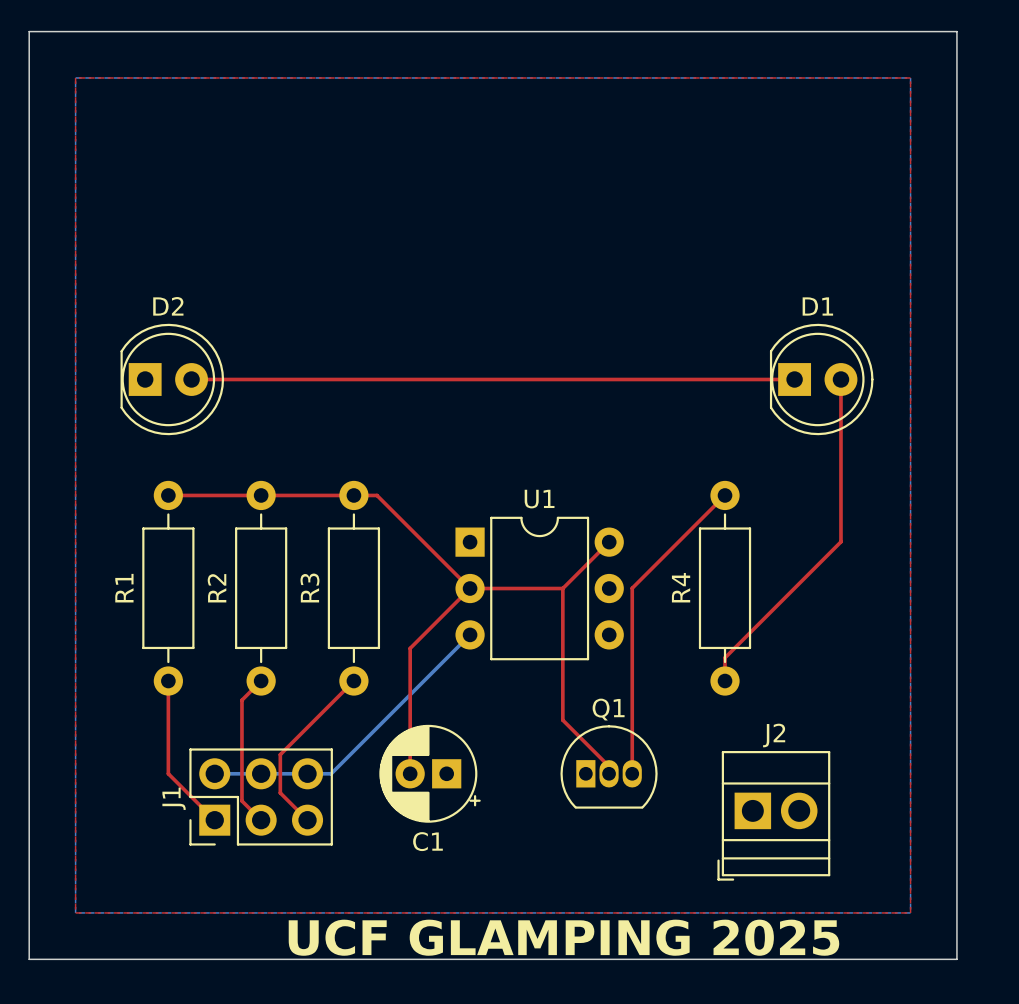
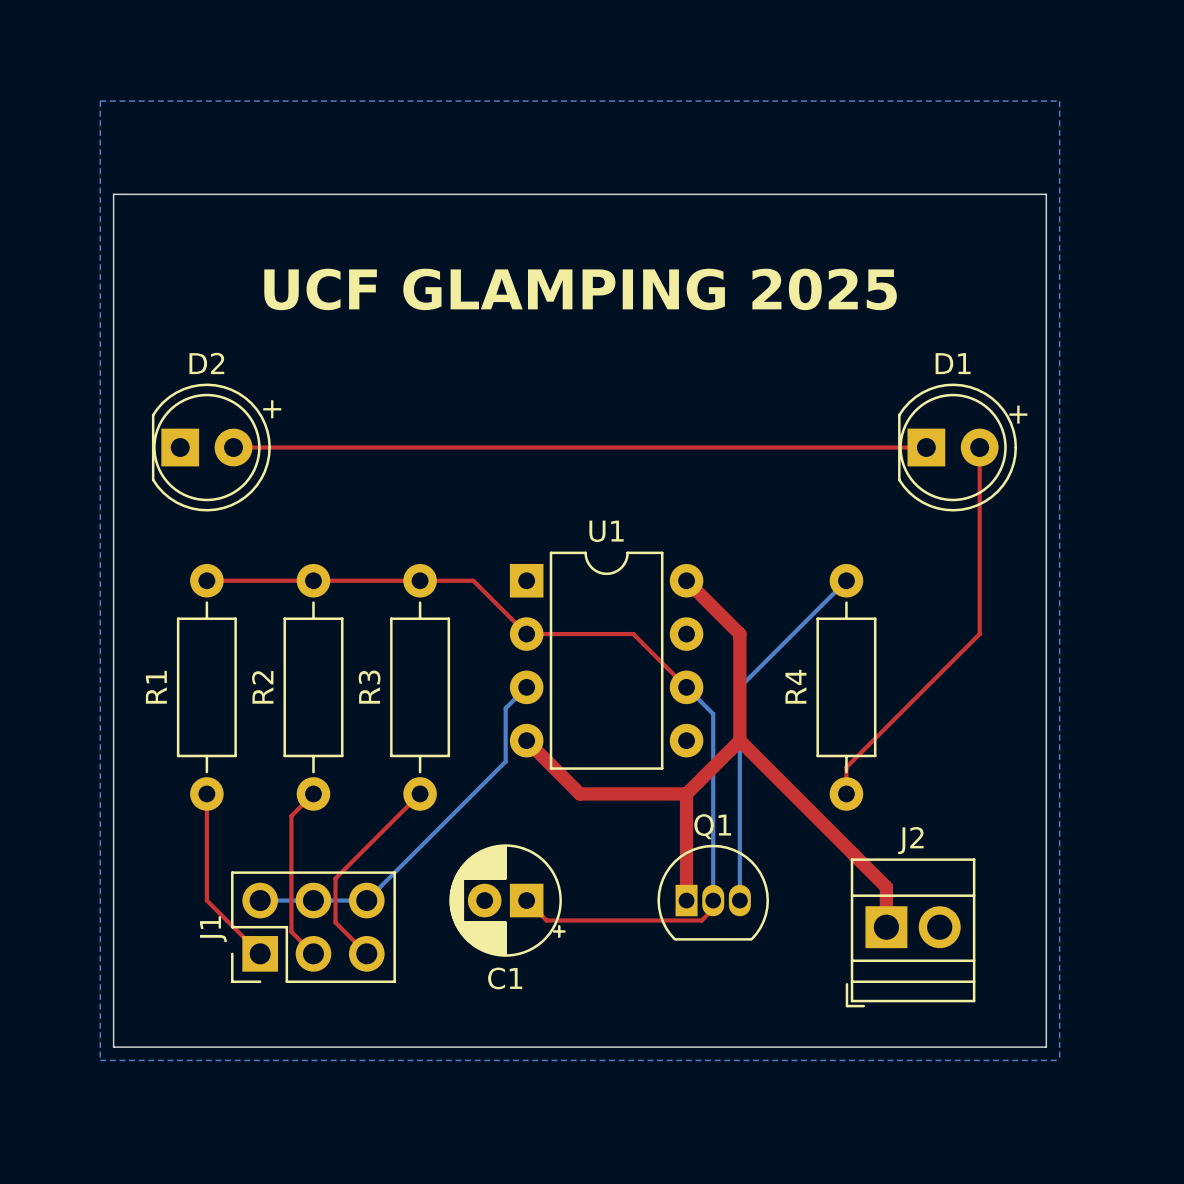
board edge: (29, 31) (956, 31) (956, 959) (29, 959) (29, 31) -> (113, 194) (113, 1047) (1046, 1047) (1046, 194) (113, 194)
top zone outline: (75, 77) (75, 912) (910, 912) (910, 77) (75, 77) -> none
text: none -> UCF GLAMPING 2025 (580, 289)
text: none -> + (272, 409)
text: none -> + (1018, 414)
top track: (377, 495) (470, 588) -> (446, 580) (473, 580) (526, 634) (633, 634) (686, 687)
top track: (725, 495) (632, 588) -> (686, 580) (739, 634) (739, 687)
bottom track: none -> (846, 580) (739, 687) (739, 900)
U1 footprint: [455, 516, 624, 661] -> [509, 551, 704, 770]
top track: (609, 542) (562, 588) -> none
top track: (470, 588) (562, 588) -> none
top track: (470, 588) (410, 648) (410, 773) -> none
top track: (562, 588) (562, 720) (609, 766) (609, 773) -> (526, 900) (546, 920) (701, 920) (713, 909) (713, 900)
bottom track: none -> (686, 687) (713, 714) (713, 900)
top track width: thin (632, 588) (632, 634) -> thick (739, 687) (739, 740)
top track: none -> (526, 740) (579, 793) (686, 793)
bottom track: (470, 634) (331, 773) (307, 773) -> (526, 687) (505, 708) (505, 761) (366, 900)
top track: (632, 634) (632, 773) -> none
top track: none -> (686, 793) (686, 900)
top track: none -> (686, 793) (739, 740) (886, 887) (886, 927)
J2 position: (773, 815) -> (910, 932)
text: UCF GLAMPING 2025 (563, 937) -> none

